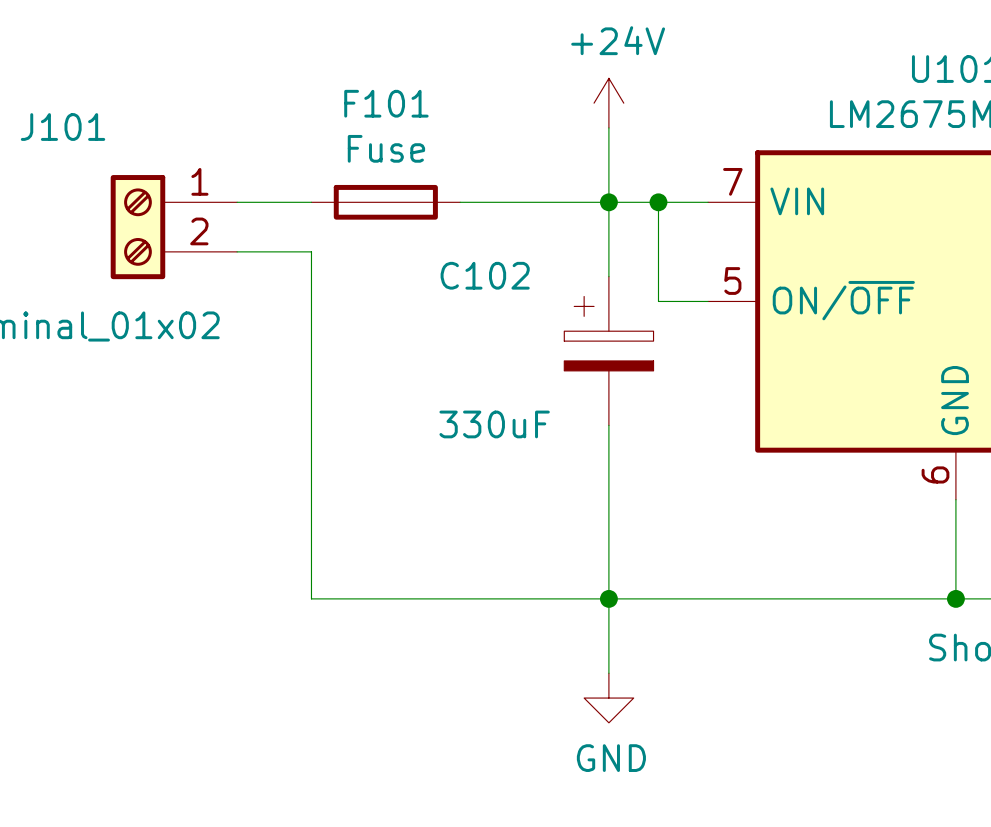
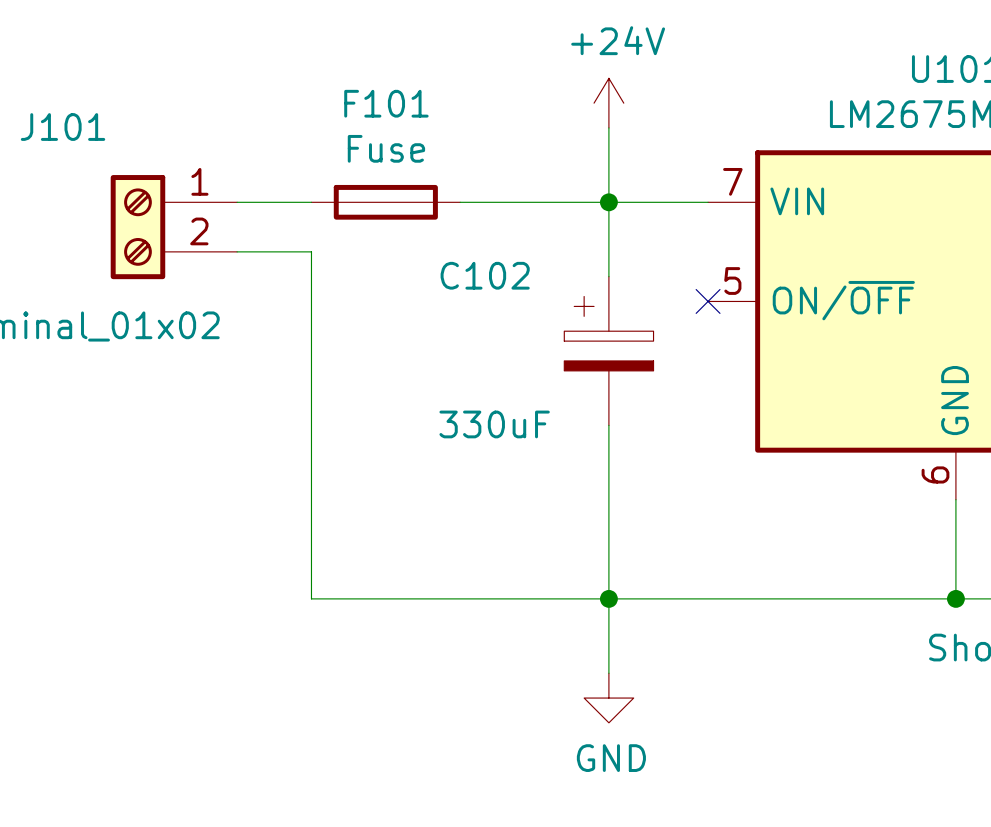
wire: (658, 202) (658, 301) (708, 301) -> none
junction: (658, 202) -> none
no-connect mark: none -> (708, 301)

